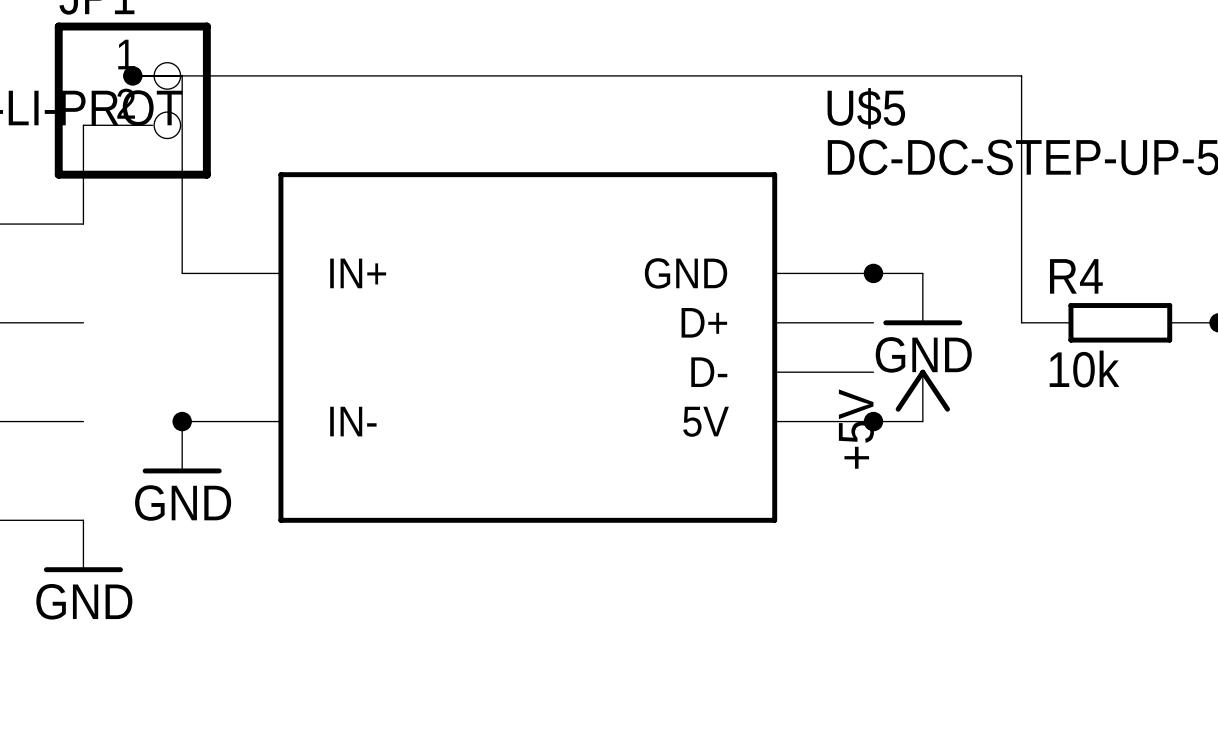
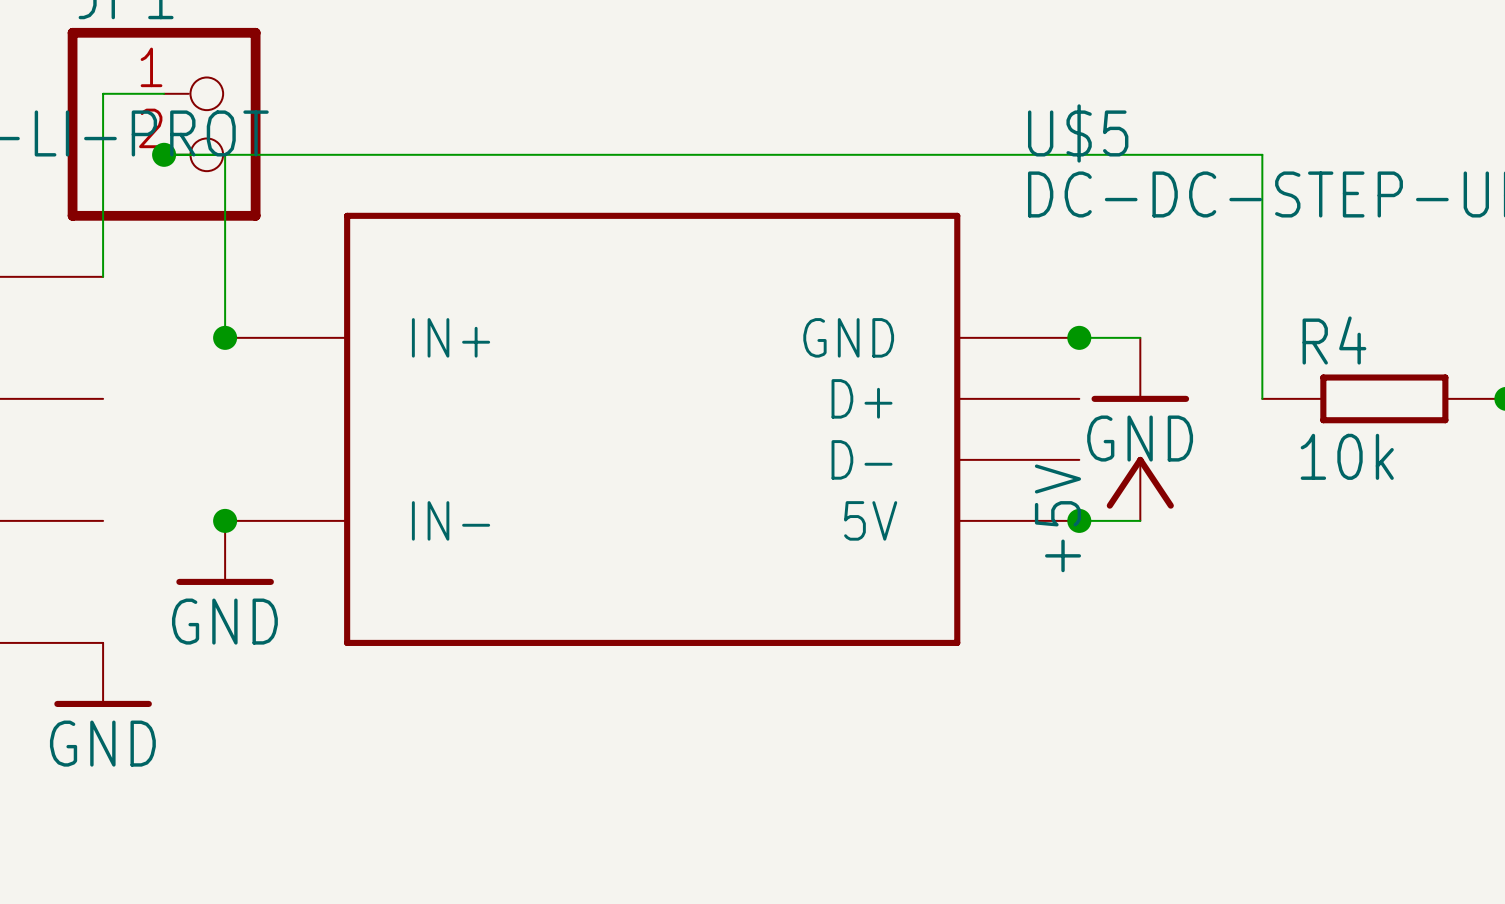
wire: (132, 75) (1021, 75) (1021, 125) -> (164, 154) (1262, 154)
junction position: (132, 75) -> (164, 154)
wire: (182, 75) (182, 125) -> none
wire: (83, 125) (132, 125) -> (103, 154) (103, 93) (164, 93)
junction: none -> (225, 337)

